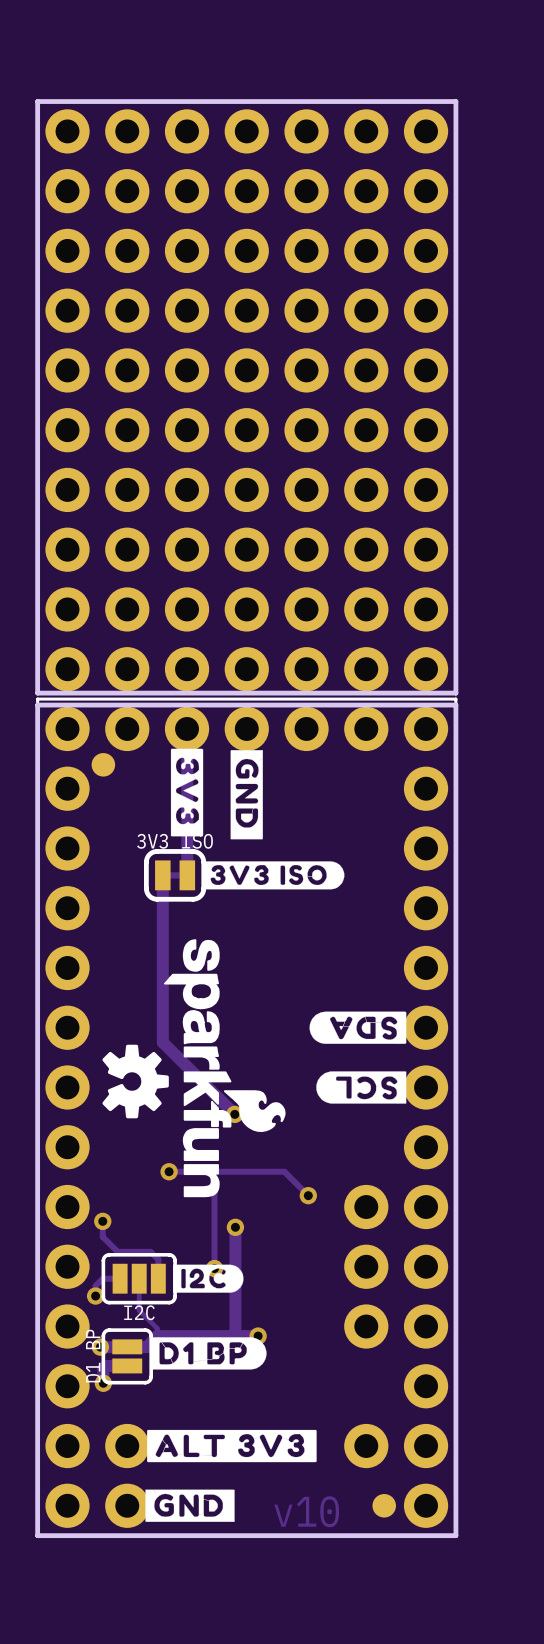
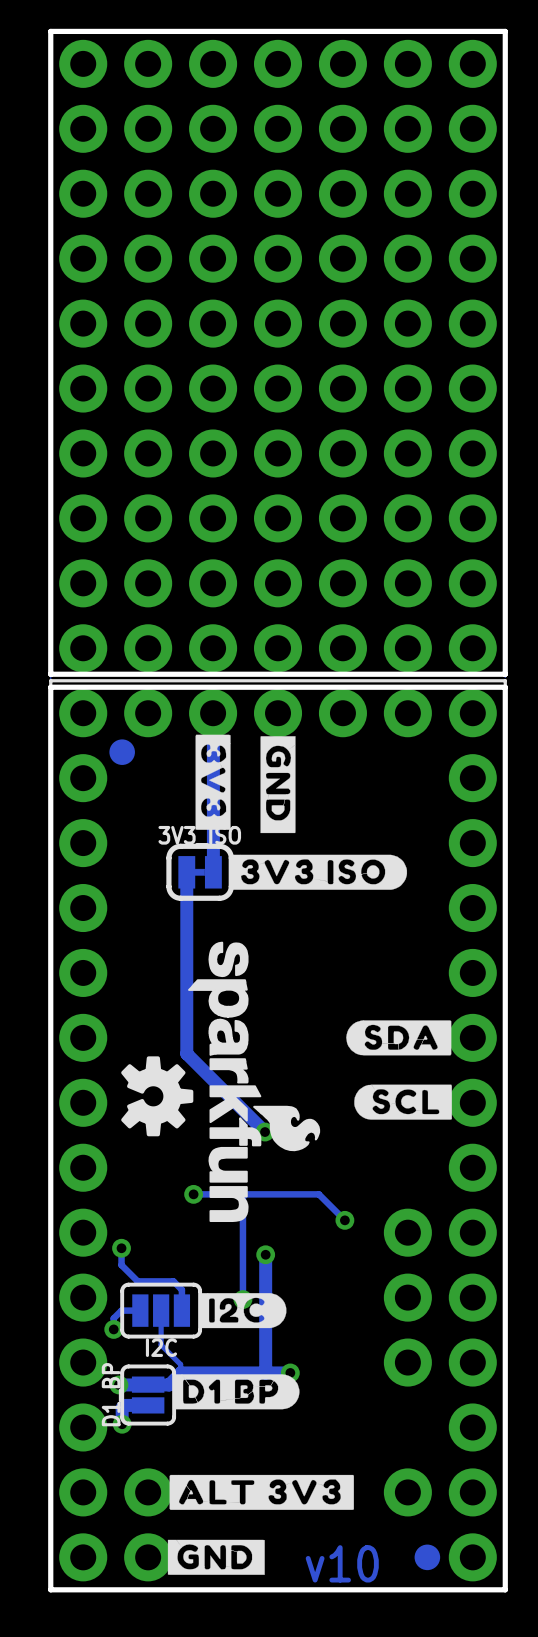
drawing shape: [202, 861, 345, 890] -> [231, 854, 408, 890]
drawing shape: [309, 1011, 407, 1044] -> [346, 1020, 452, 1056]
drawing shape: [316, 1071, 407, 1104] -> [354, 1084, 452, 1120]
drawing shape: [173, 1264, 244, 1293] -> [198, 1293, 287, 1329]

